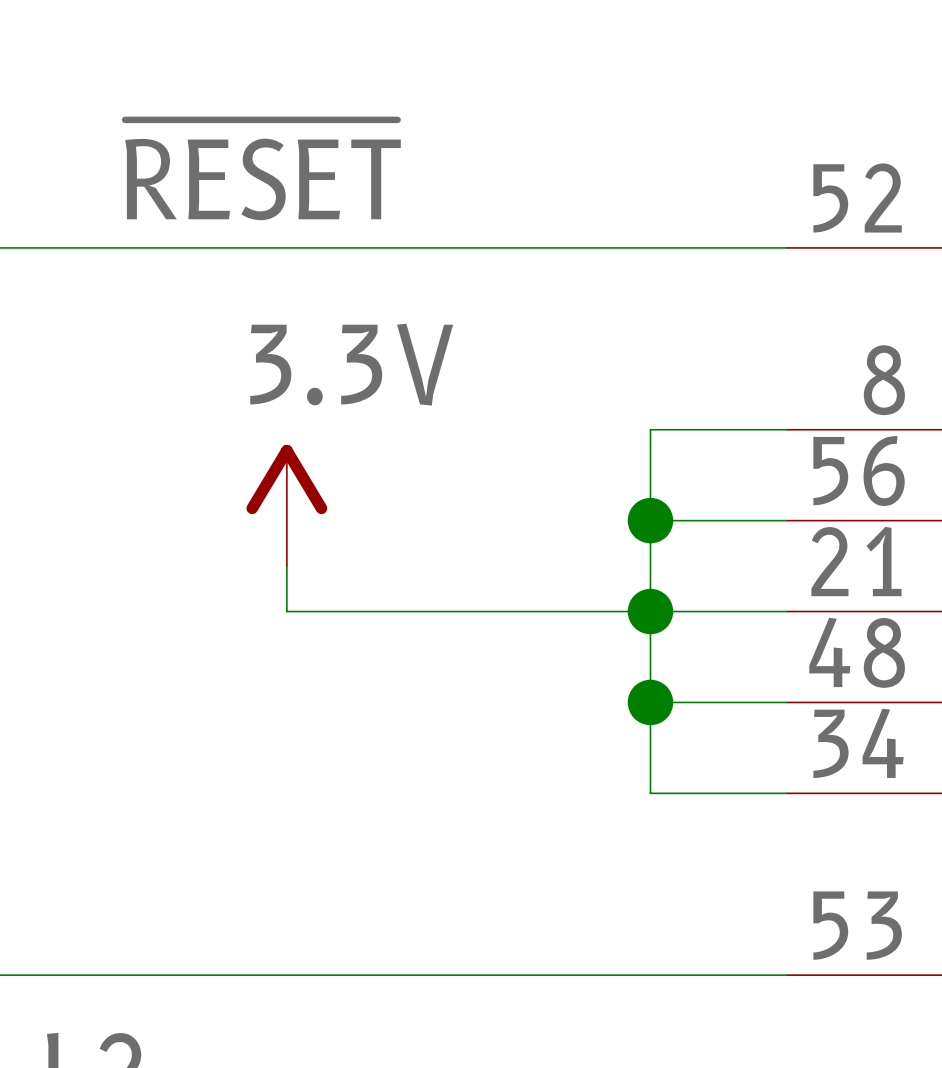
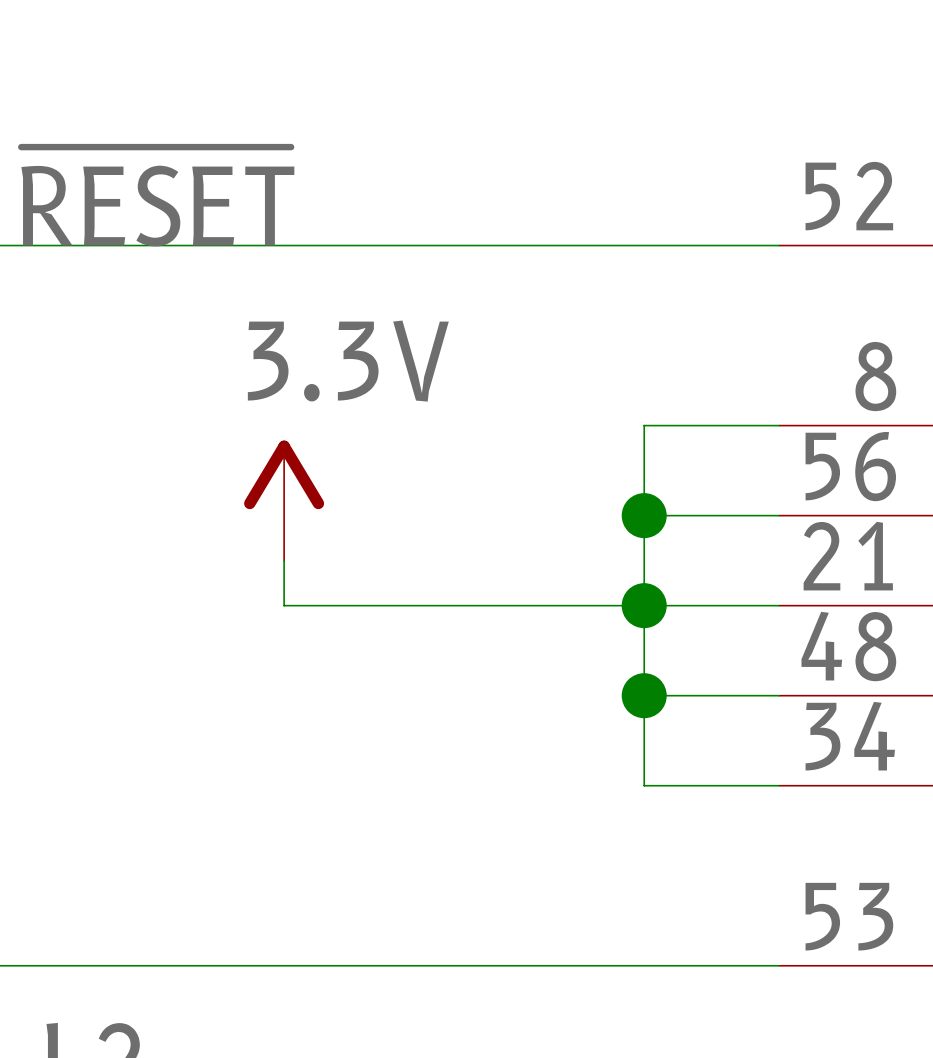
label position: ~{RESET} (262, 170) -> ~{RESET} (157, 196)

